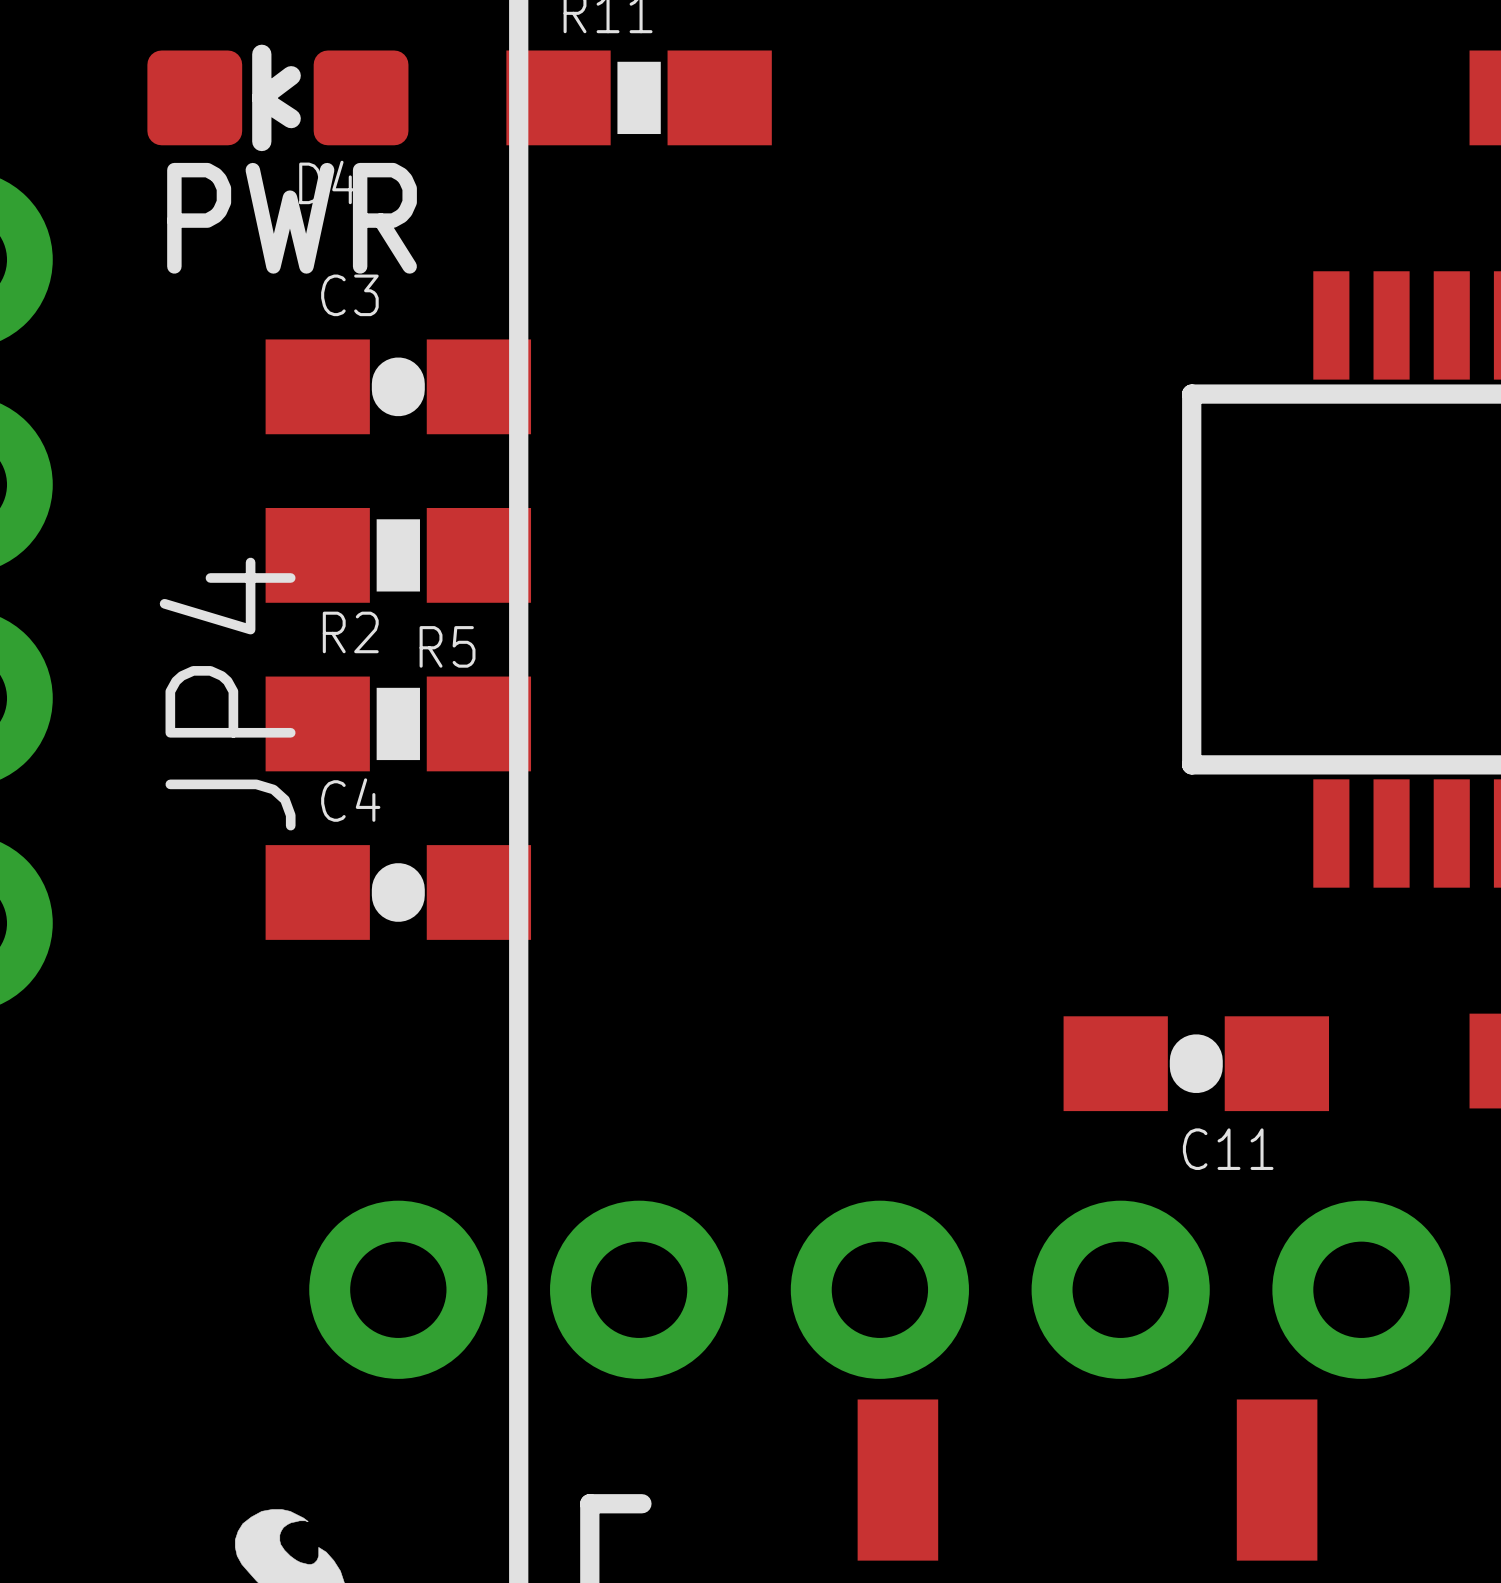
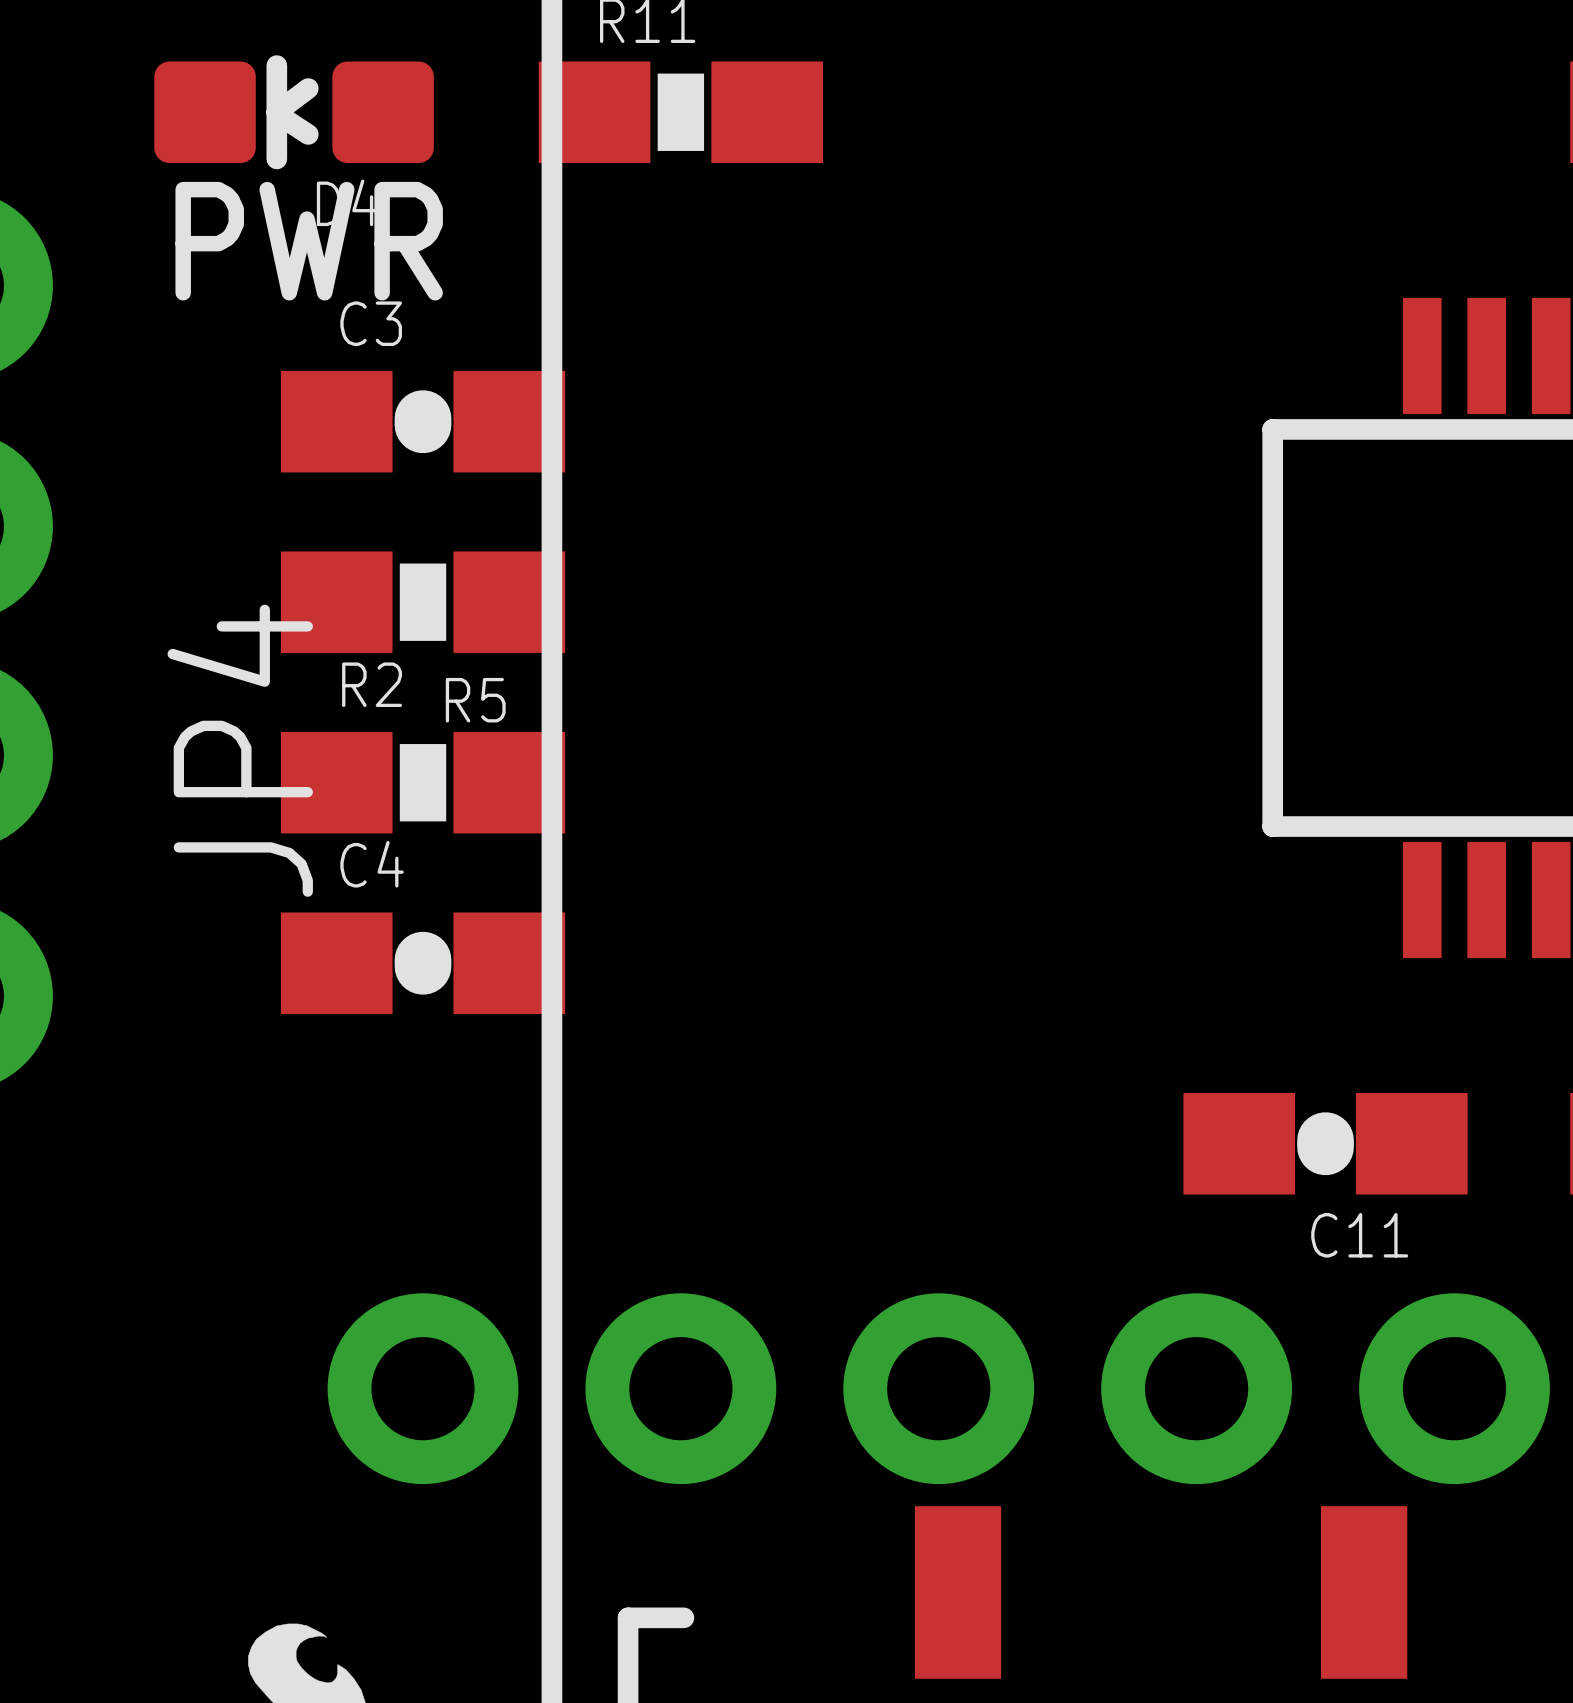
C11 position: (1196, 1063) -> (1325, 1143)

